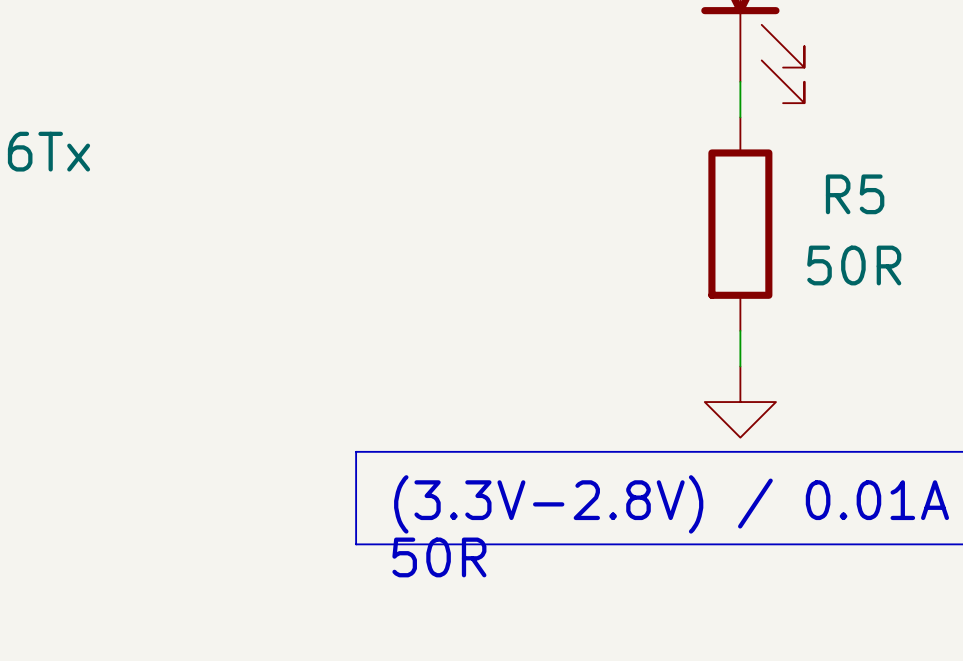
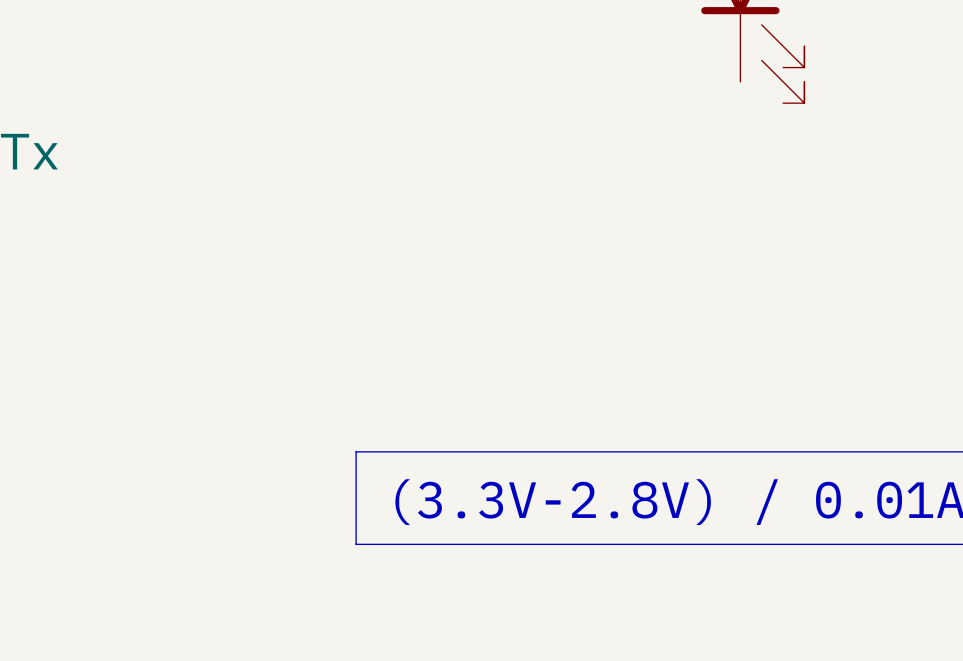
wire: (740, 81) (740, 117) -> none
R5: 50R (740, 224) -> none
wire: (740, 330) (740, 366) -> none
power symbol: (740, 402) -> none
text: 50R (439, 557) -> none

